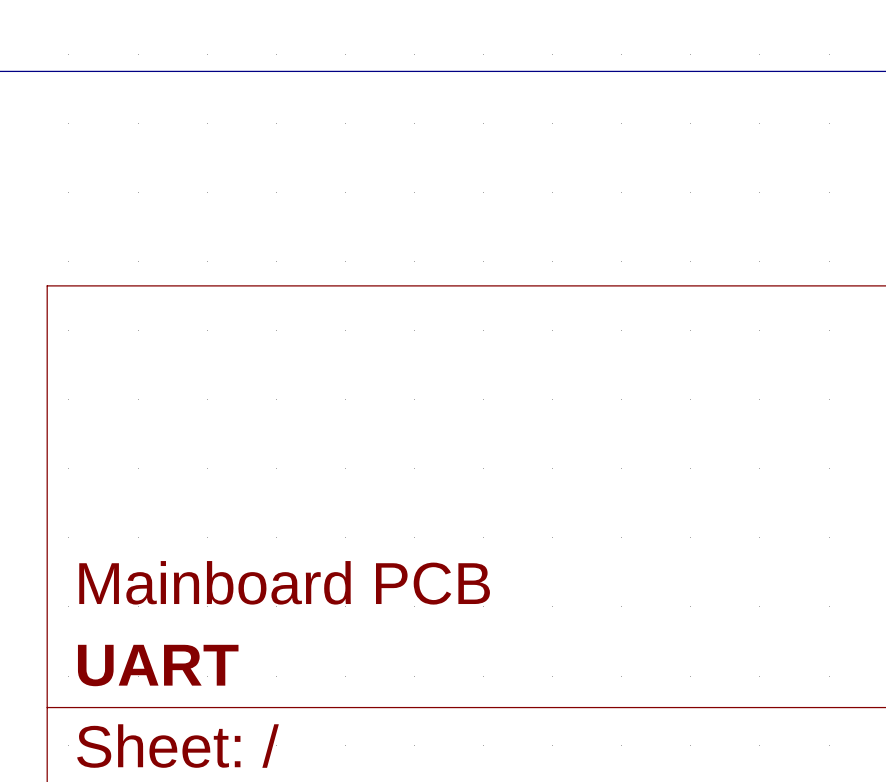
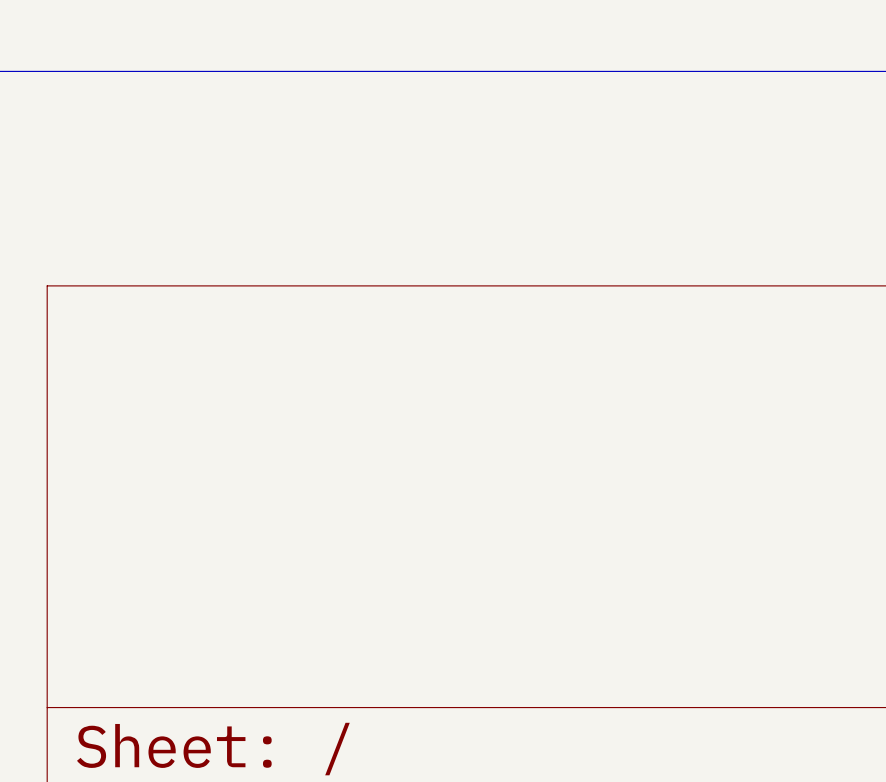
title block: Mainboard PCB (284, 582) -> none
title block: UART (158, 665) -> none

